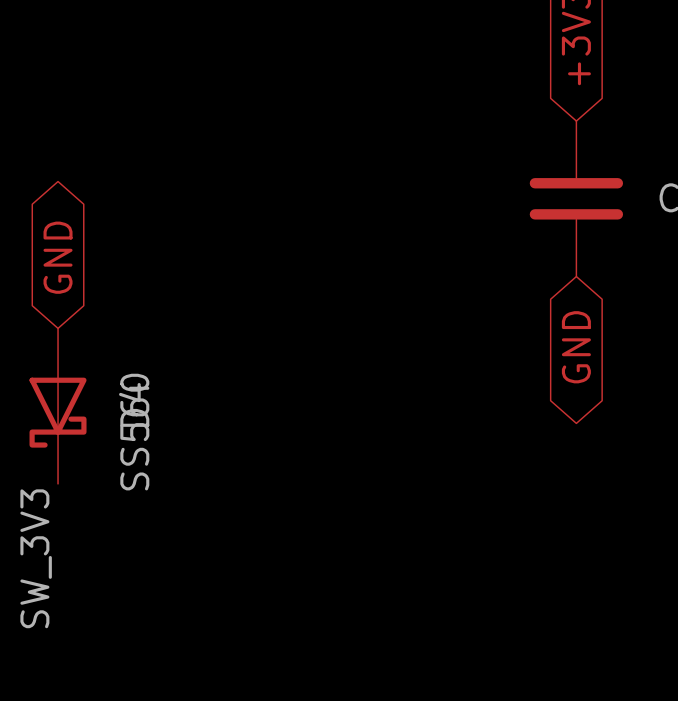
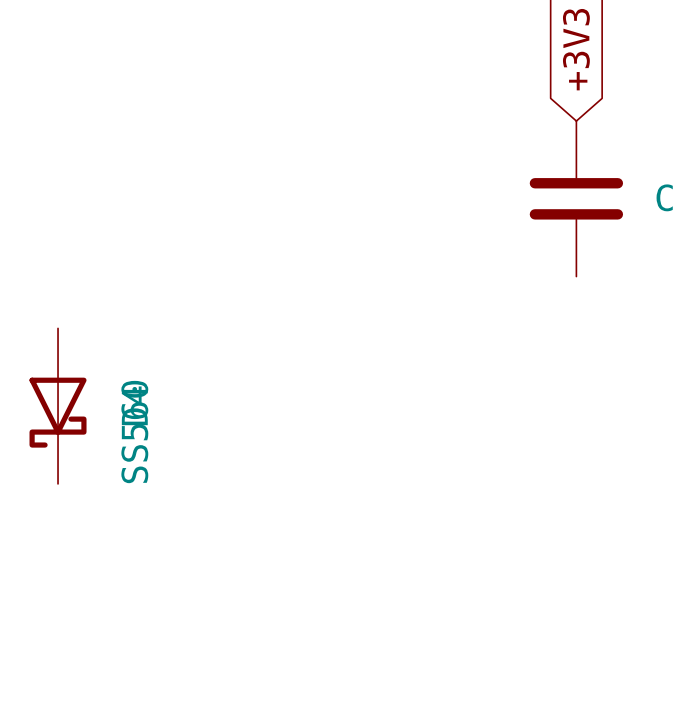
global label: GND (58, 257) -> none
global label: GND (576, 347) -> none
label: SW_3V3 (36, 558) -> none

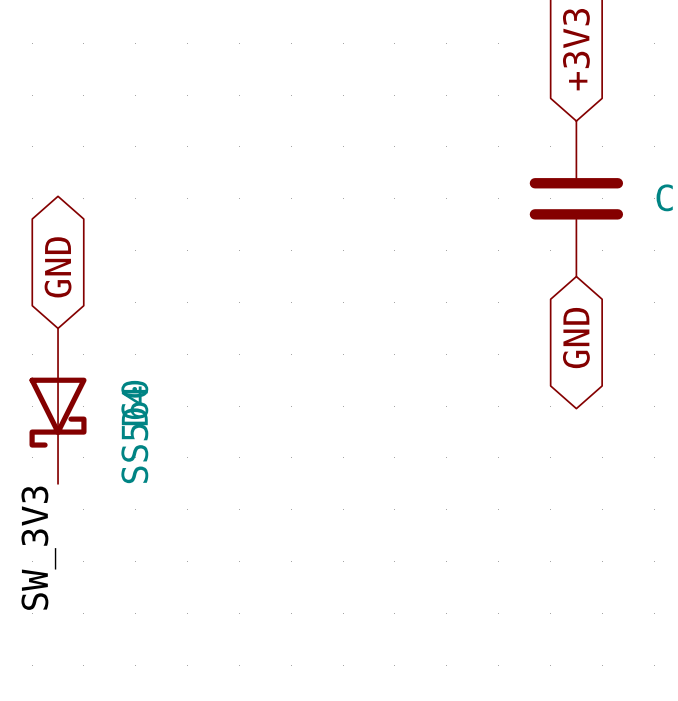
global label: none -> GND (58, 267)
global label: none -> GND (576, 338)
label: none -> SW_3V3 (38, 548)

